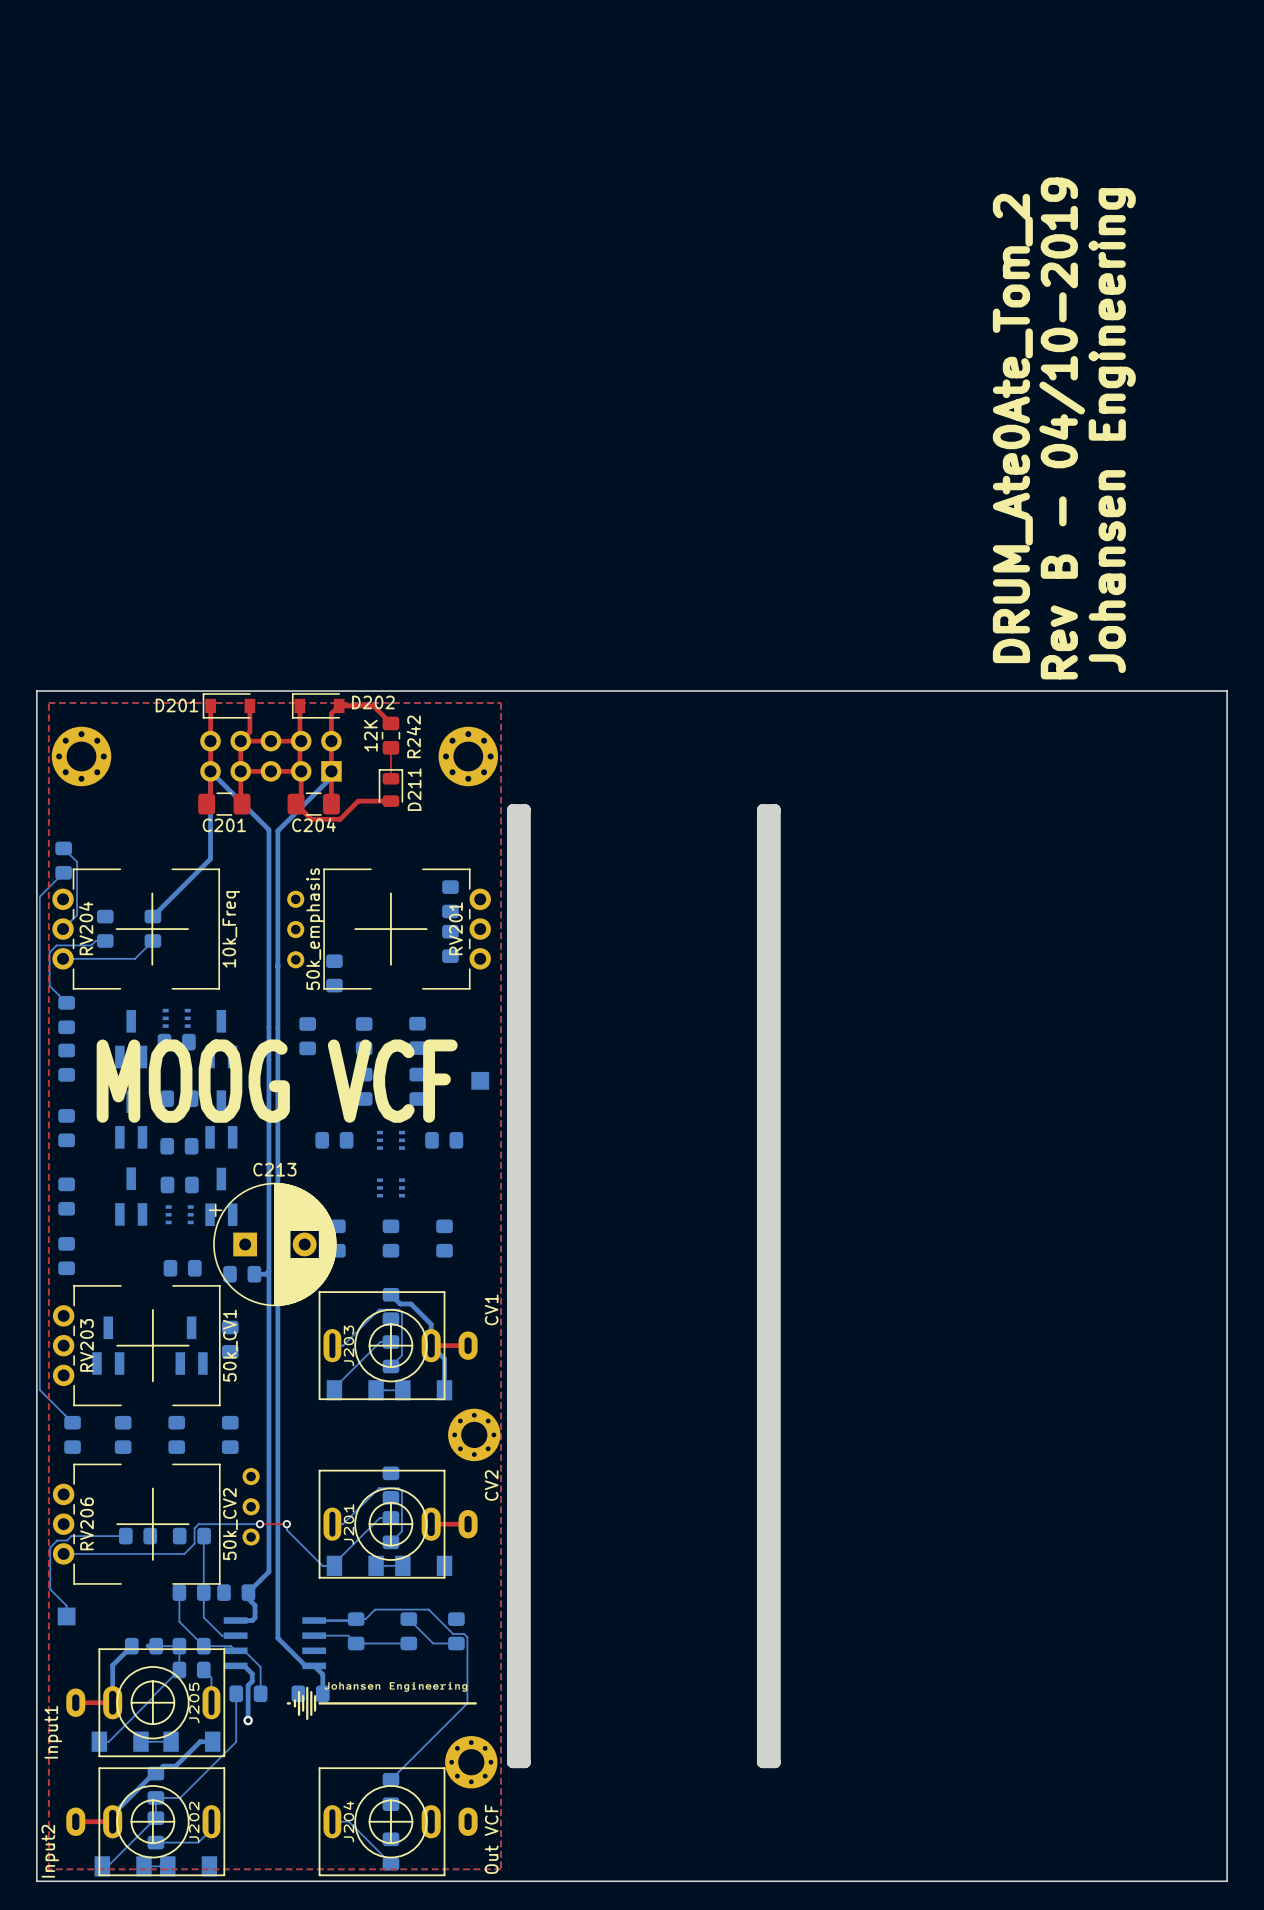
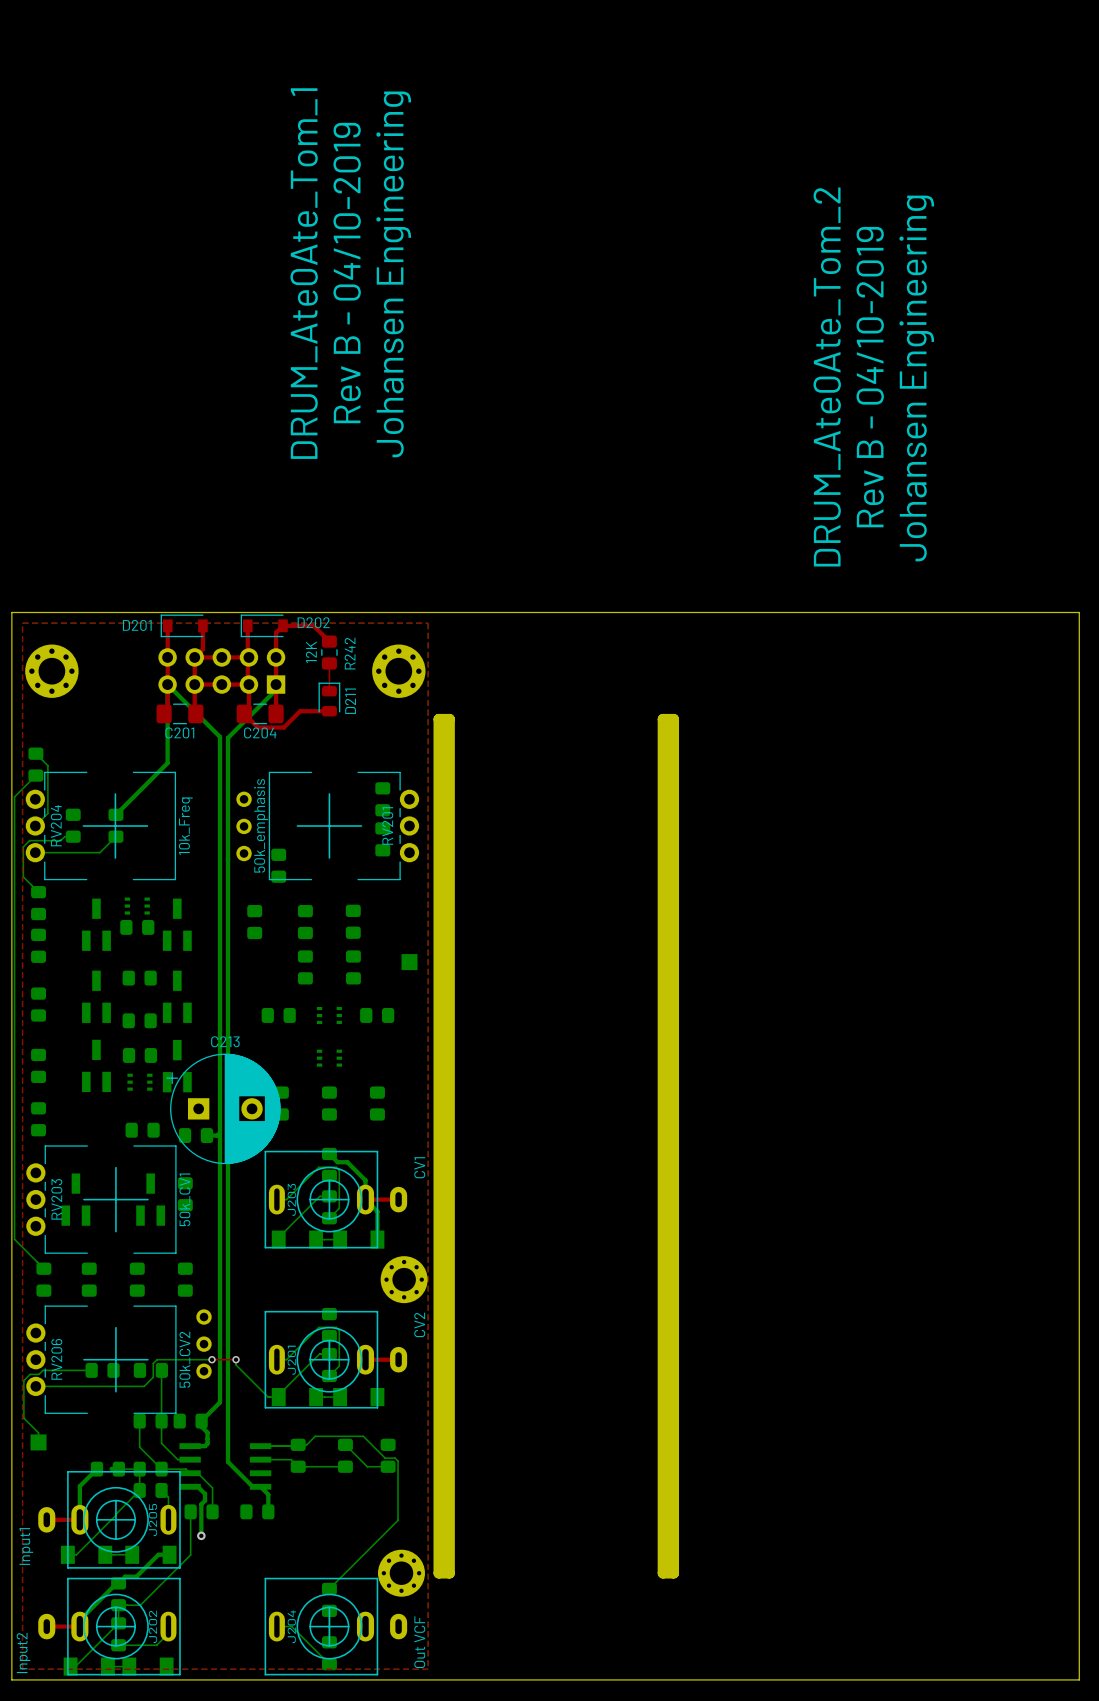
text: none -> DRUM_Ate0Ate_Tom_1 (304, 273)
text: none -> Rev B - 04/10-2019 (347, 273)
text: none -> Johansen Engineering (393, 274)
text position: DRUM_Ate0Ate_Tom_2 (1012, 428) -> DRUM_Ate0Ate_Tom_2 (827, 376)
text position: Rev B - 04/10-2019 (1062, 428) -> Rev B - 04/10-2019 (870, 377)
text position: Johansen Engineering (1112, 430) -> Johansen Engineering (916, 378)
text: MOOG VCF (277, 1081) -> none
drawing: [286, 1682, 477, 1720] -> none

